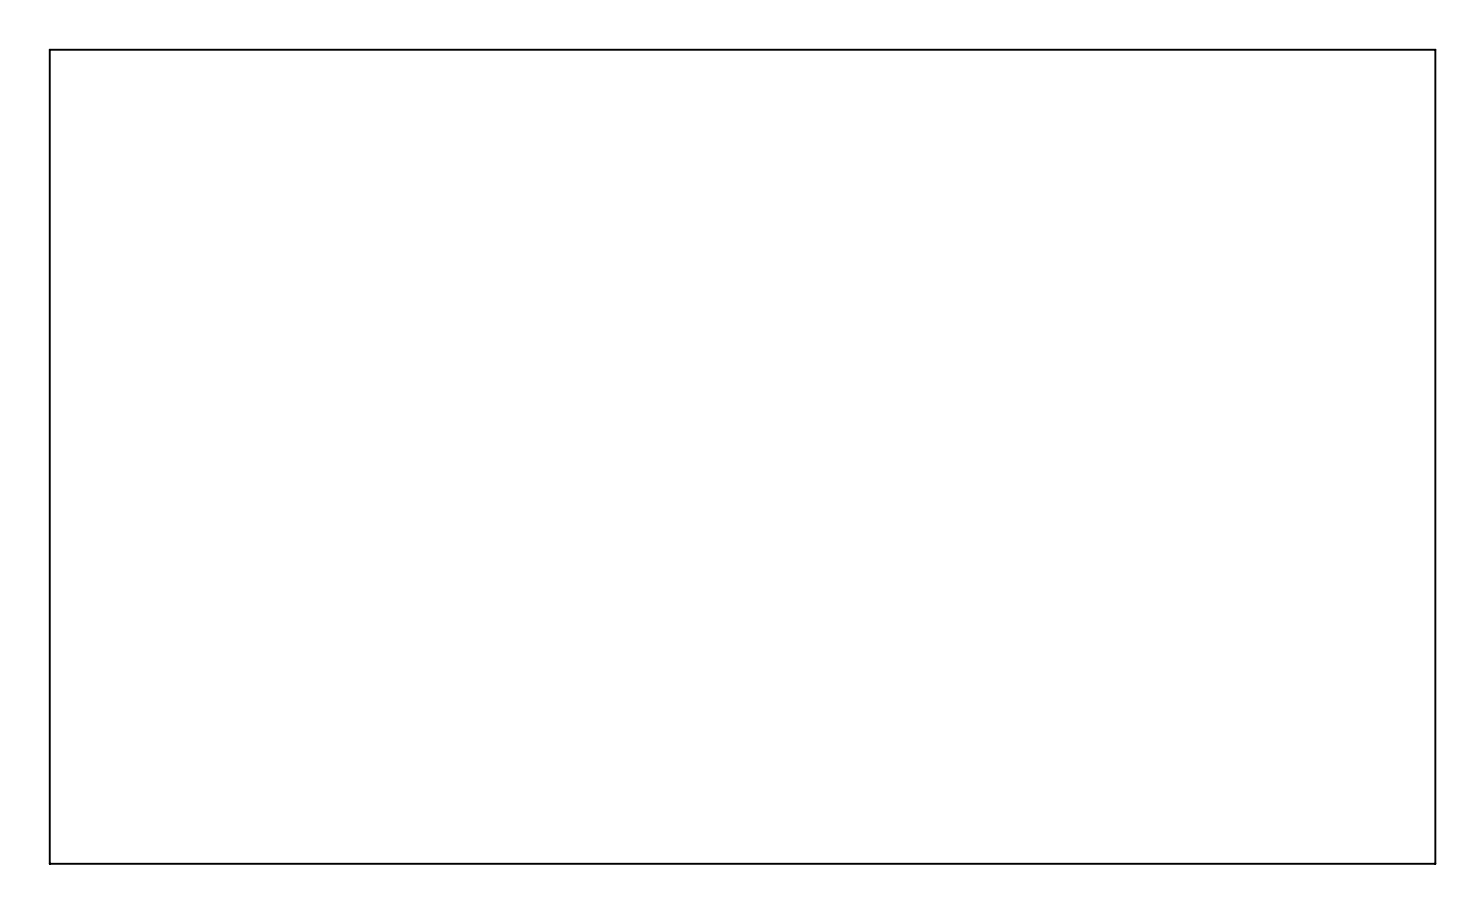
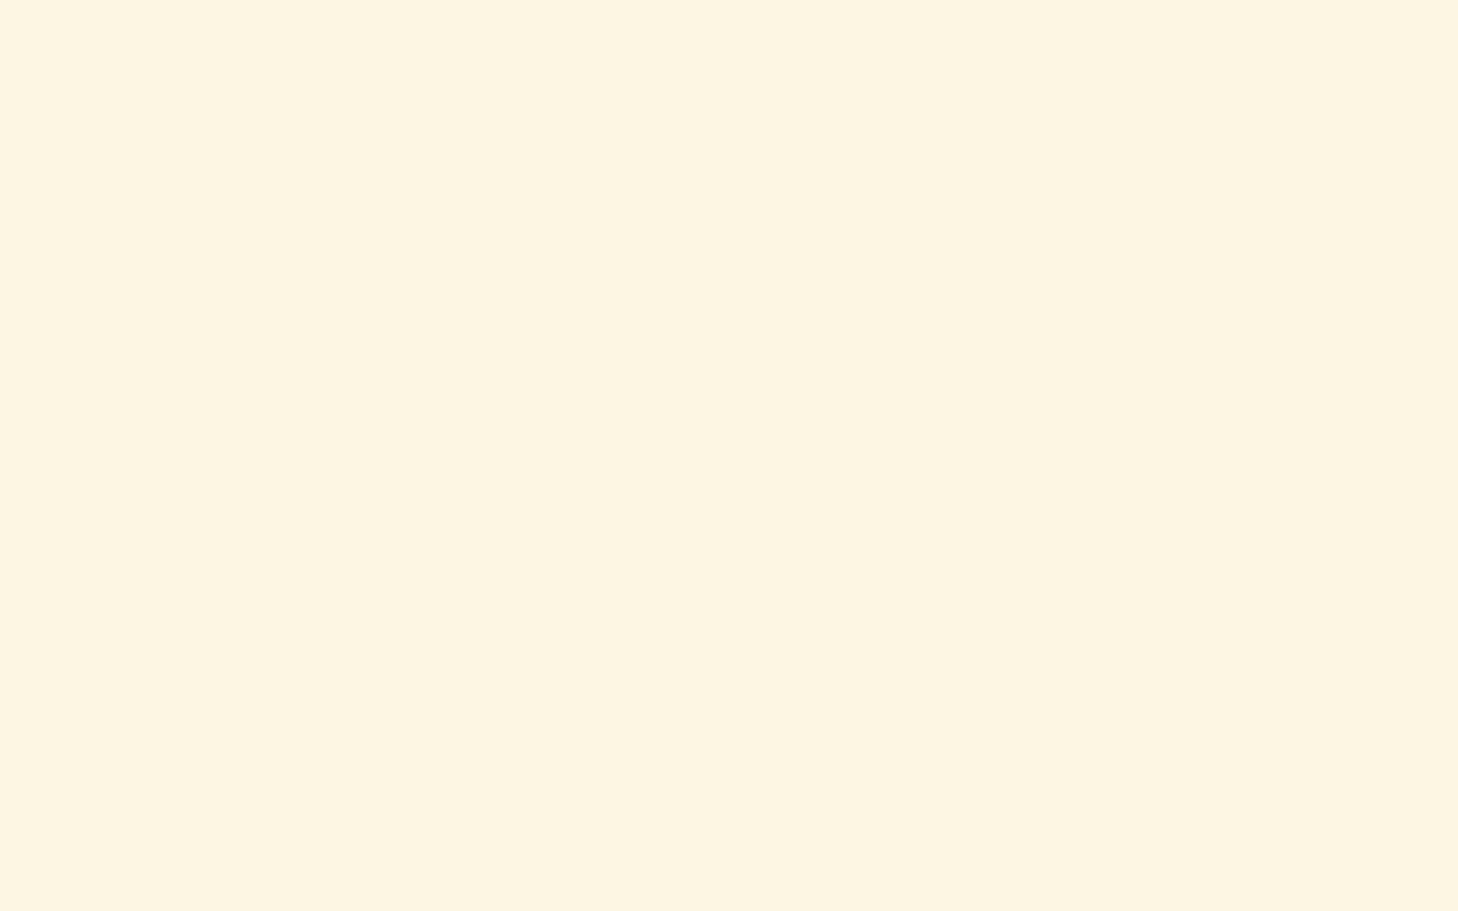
line: (49, 49) (1435, 49) (1435, 863) (49, 863) (49, 49) -> none

